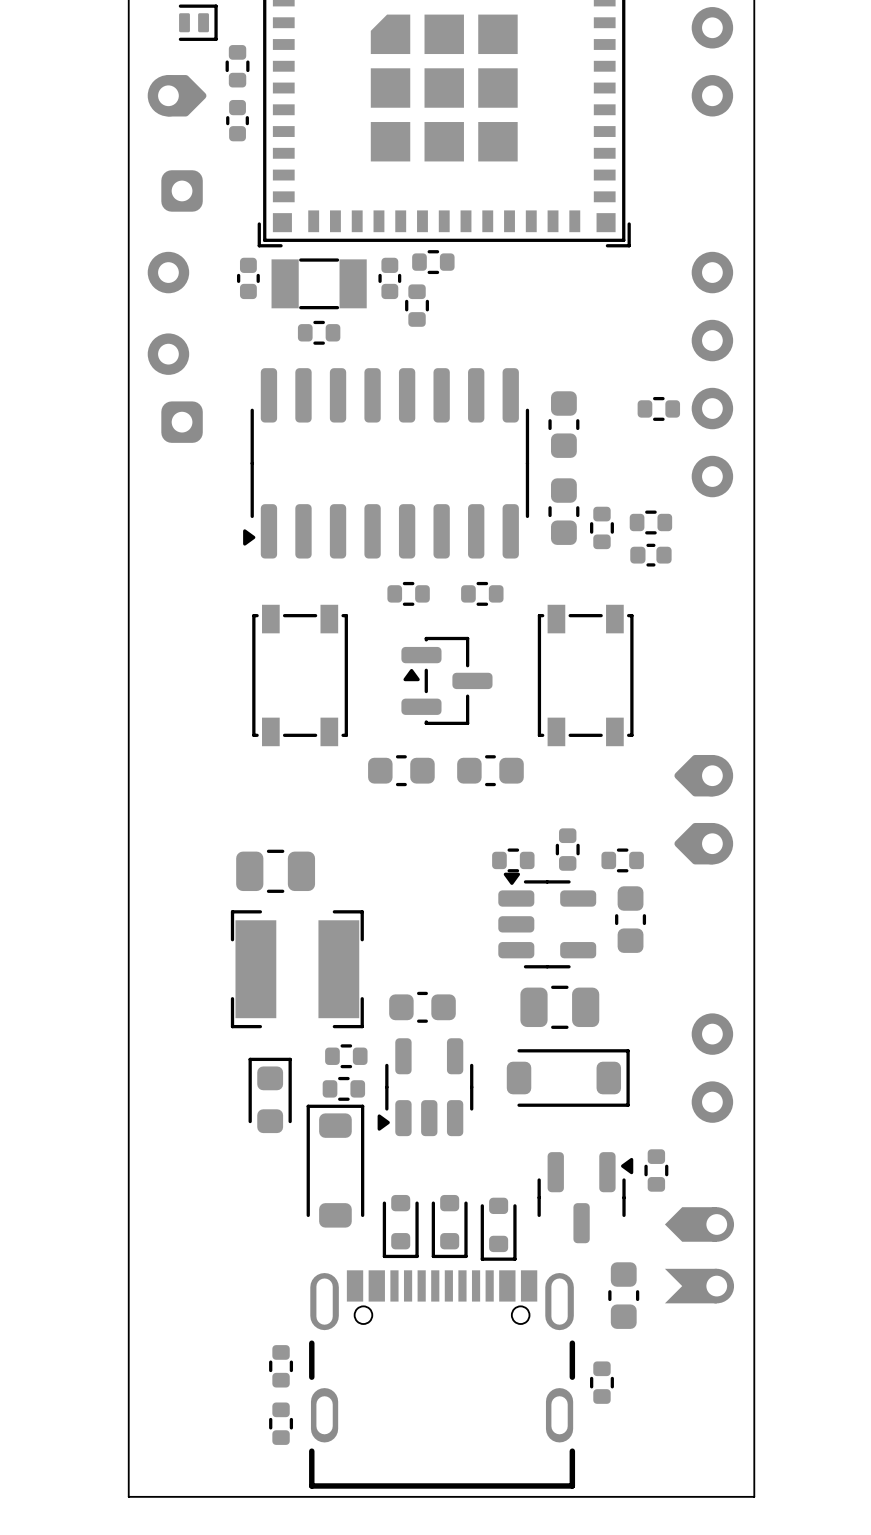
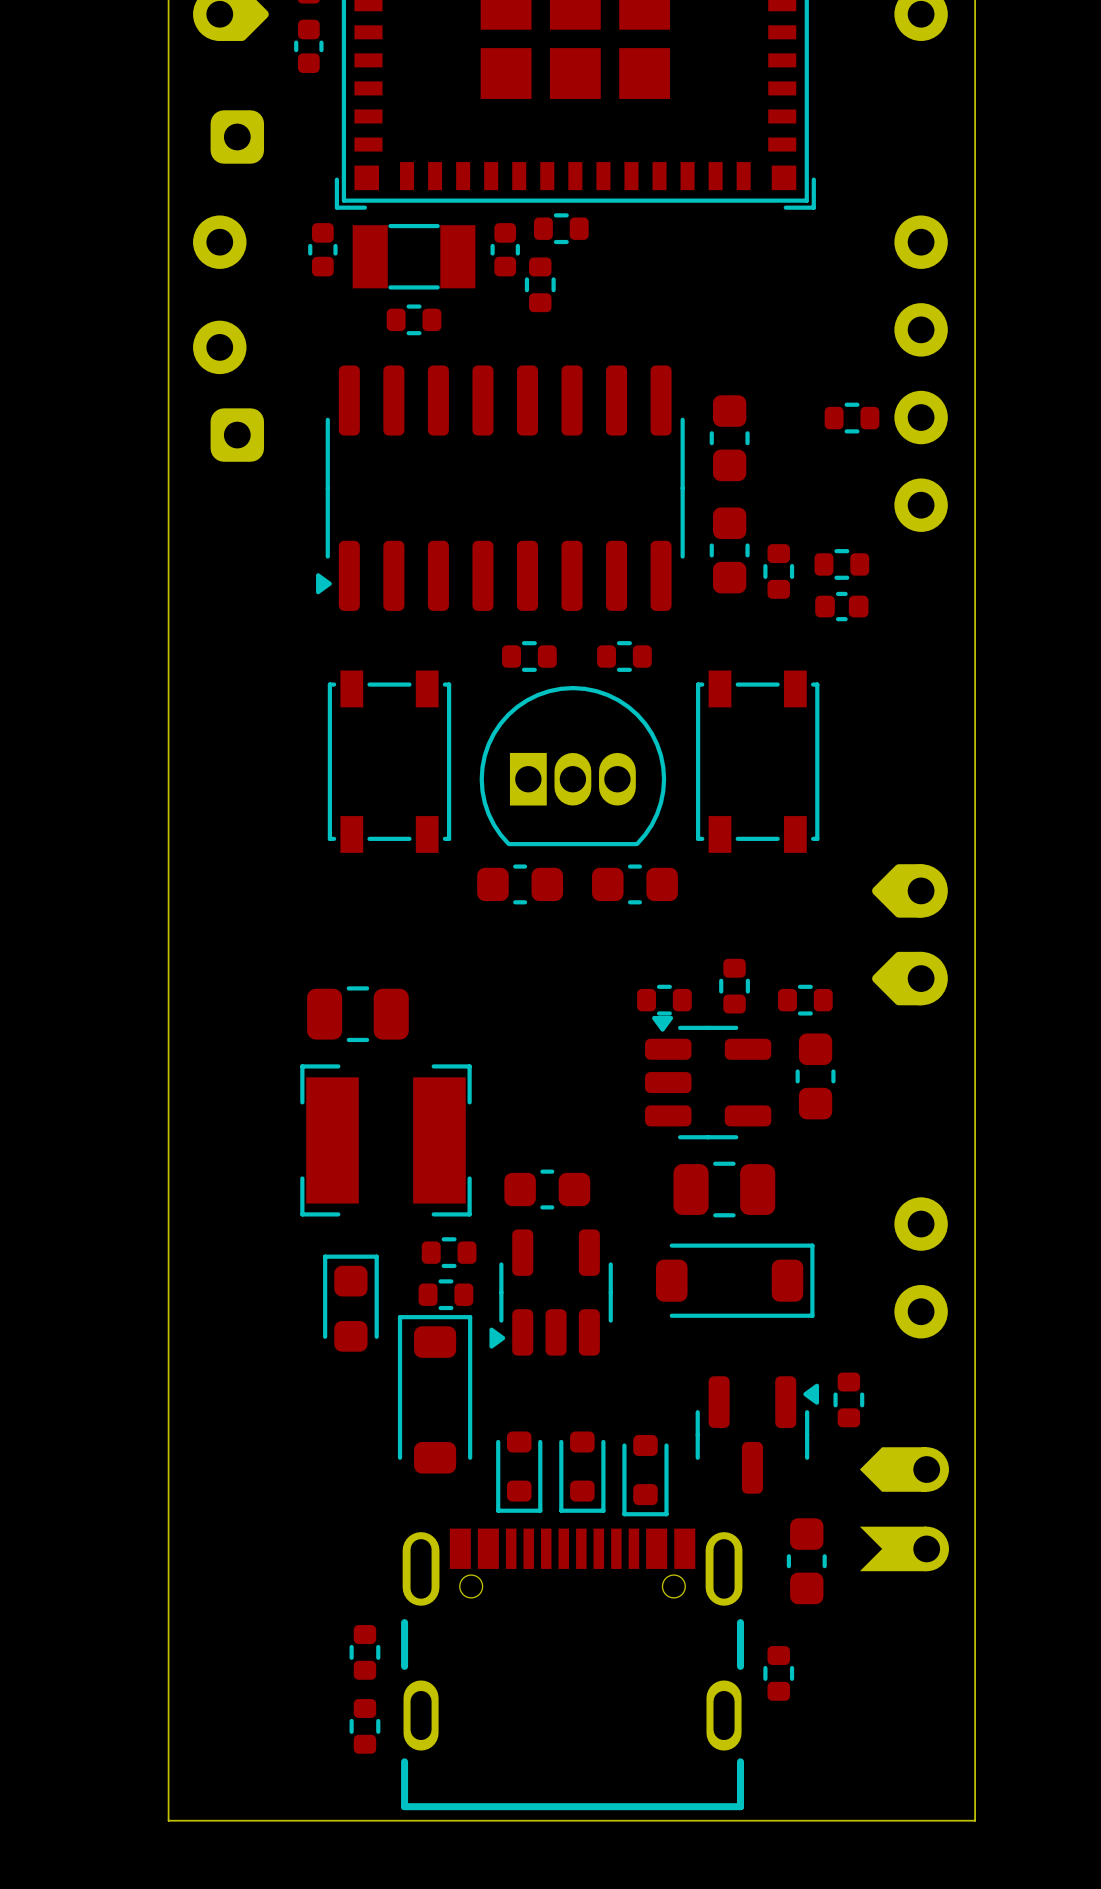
part footprint: [401, 636, 493, 725] -> [479, 685, 667, 847]

